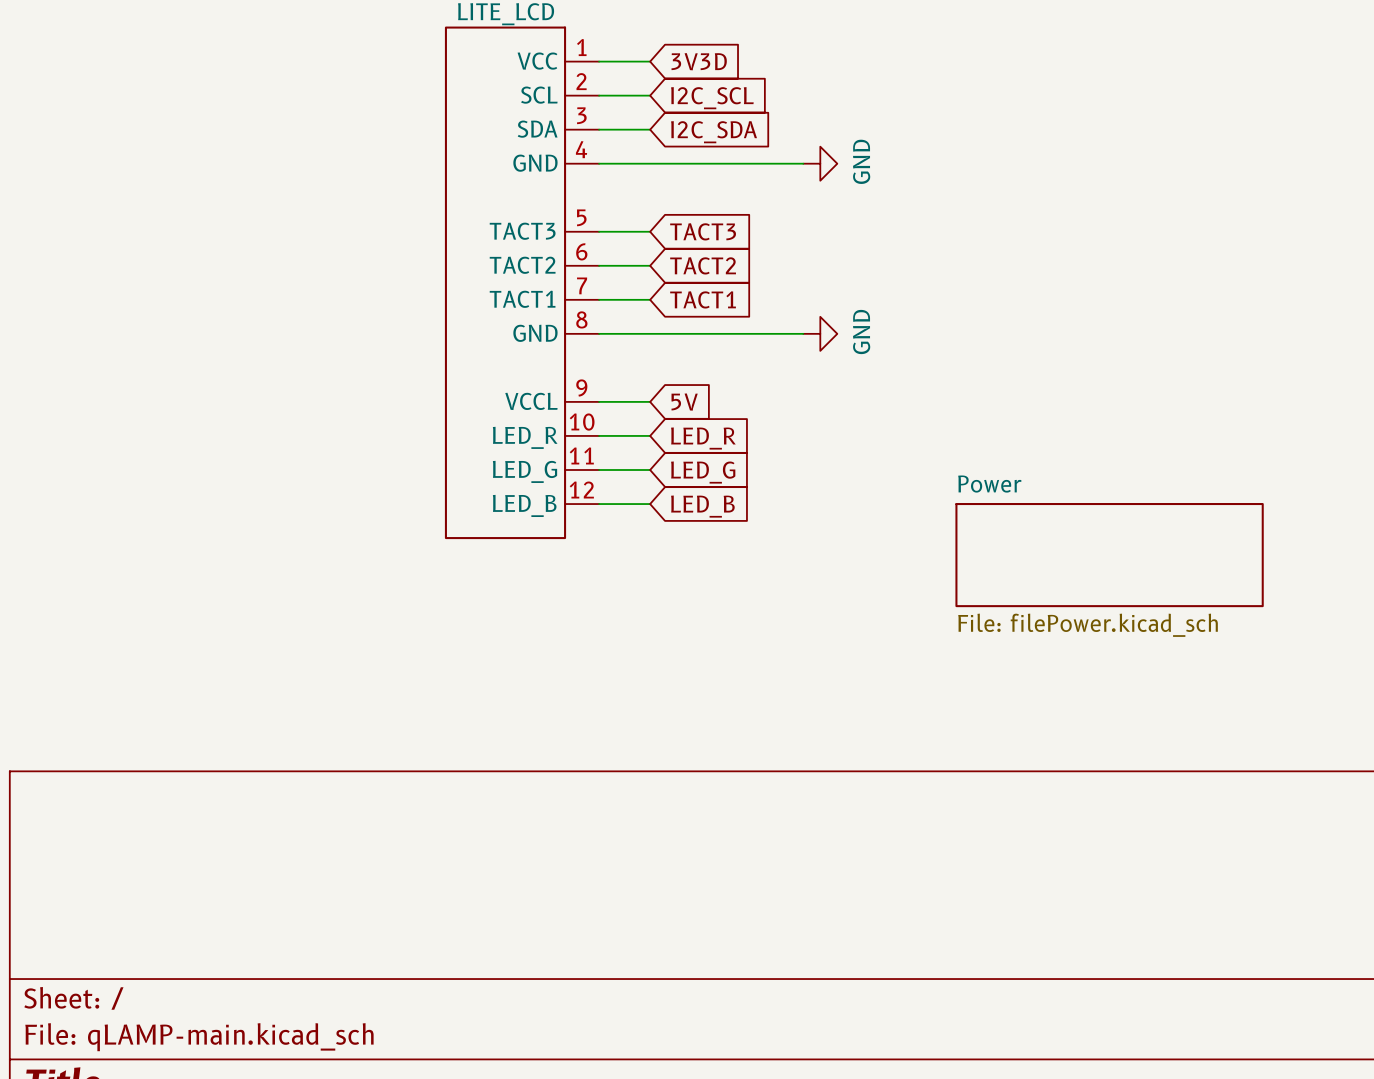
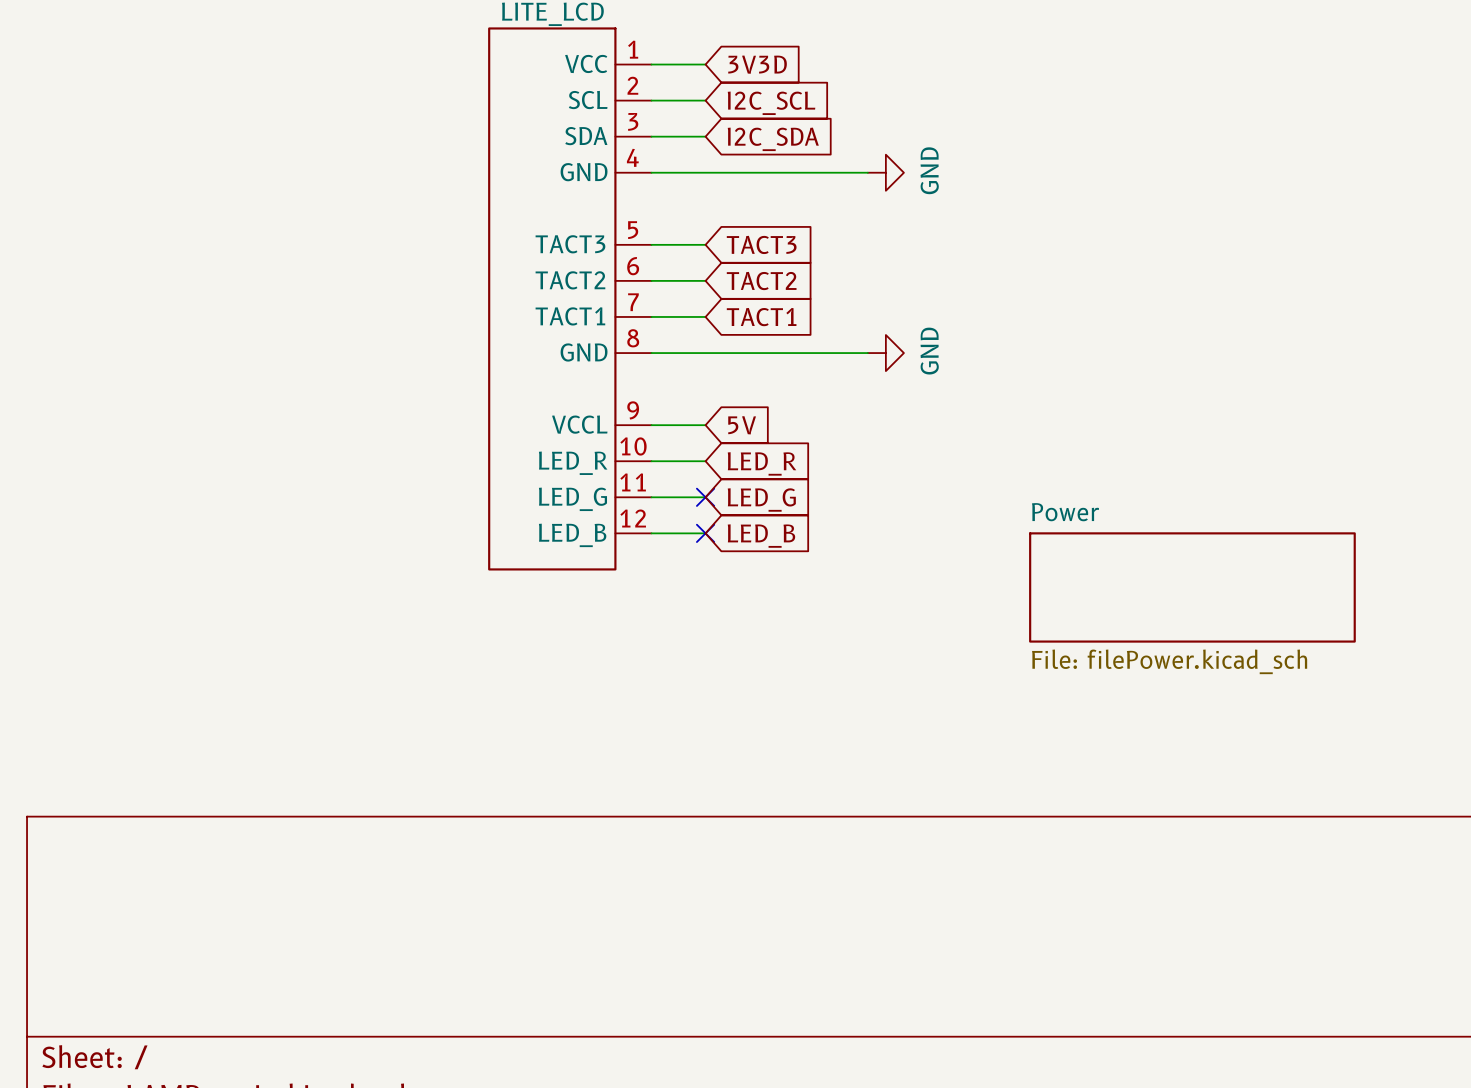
no-connect mark: none -> (705, 497)
no-connect mark: none -> (705, 533)

